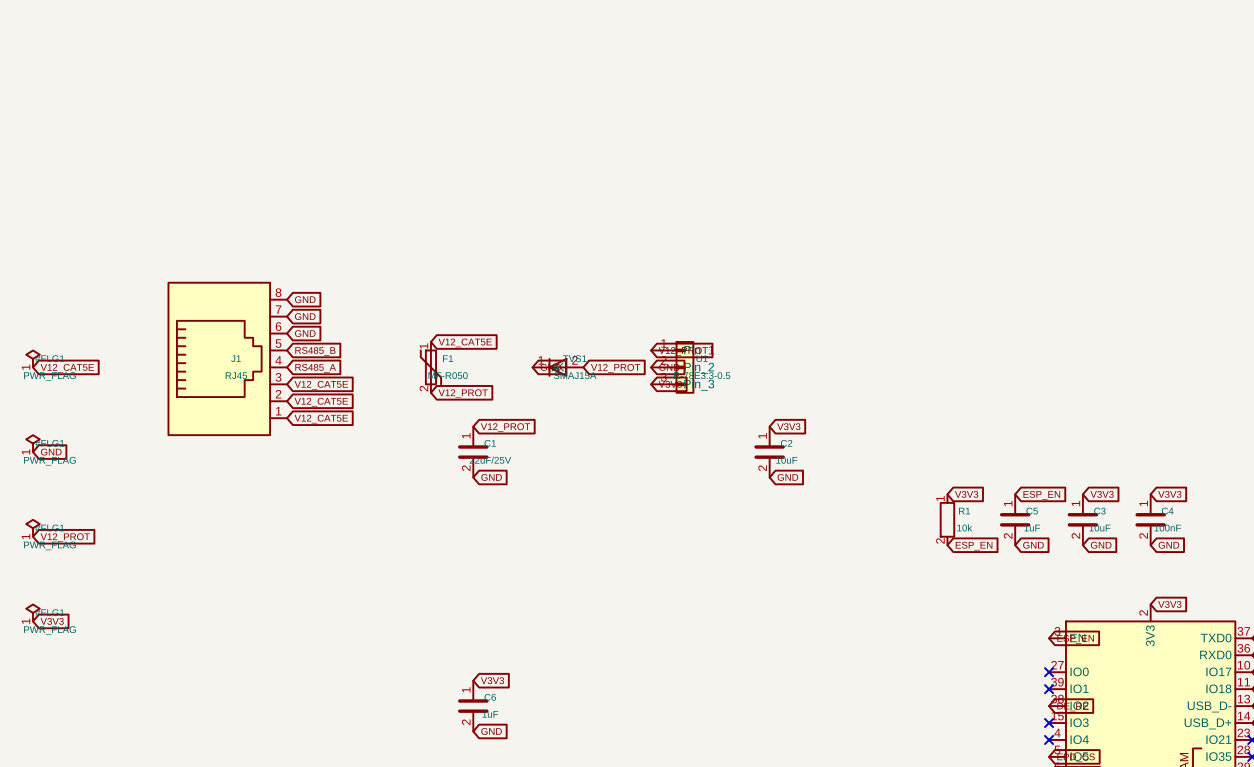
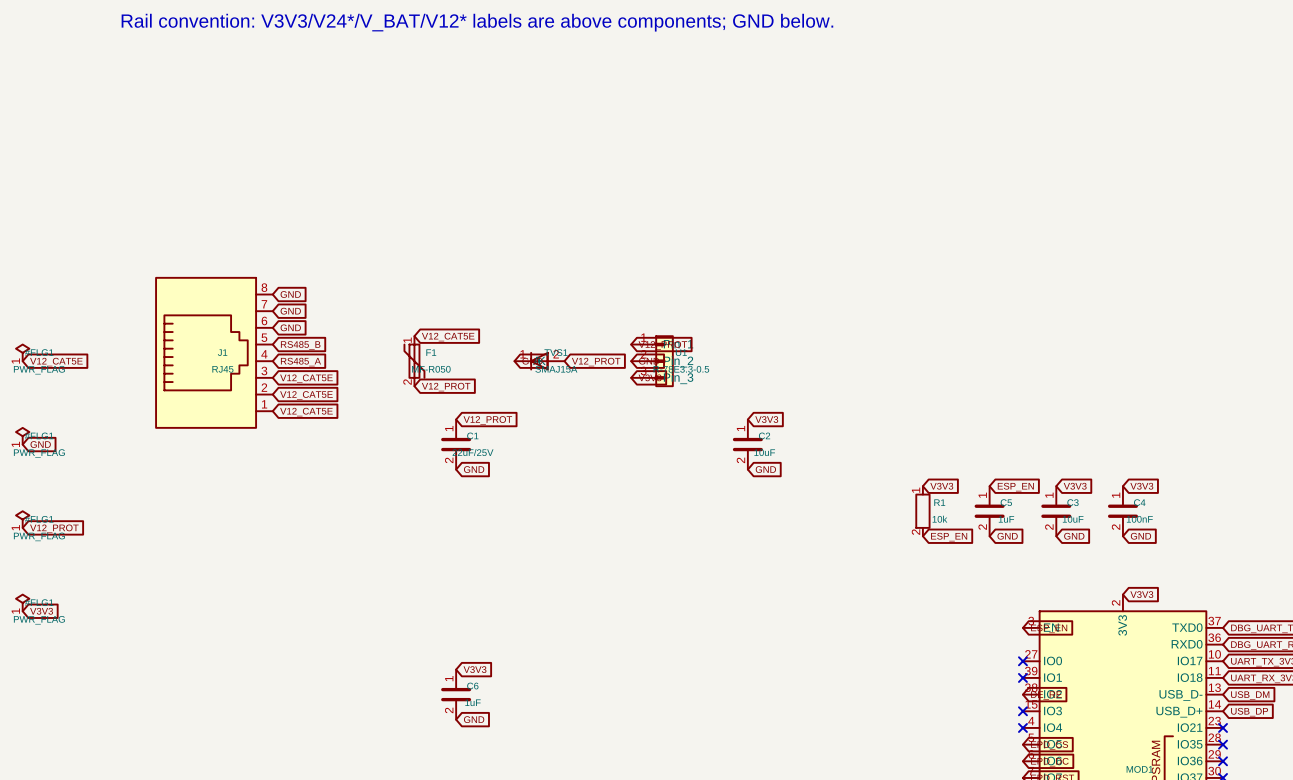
text: none -> Rail convention: V3V3/V24*/V_BAT/V12* labels are above components; GND below. (477, 22)

